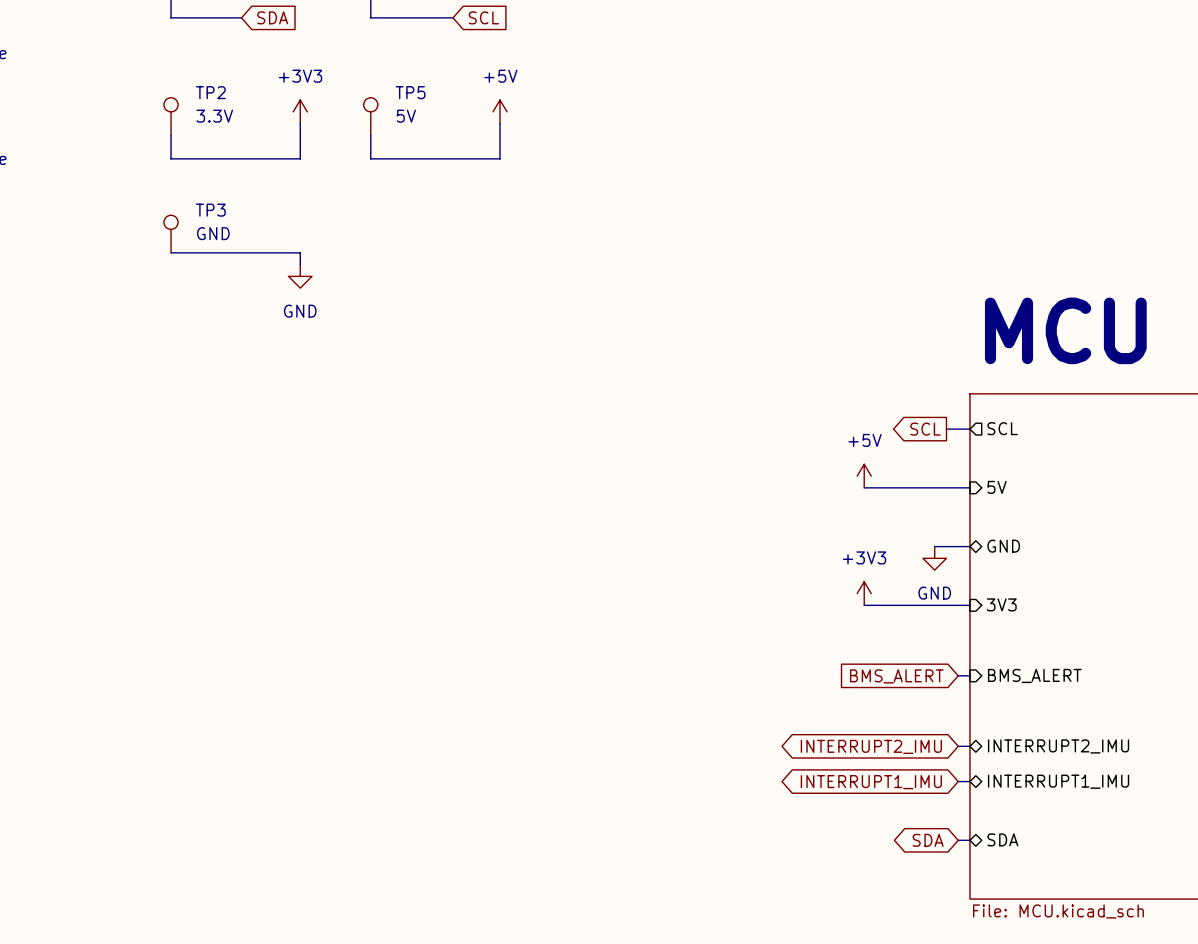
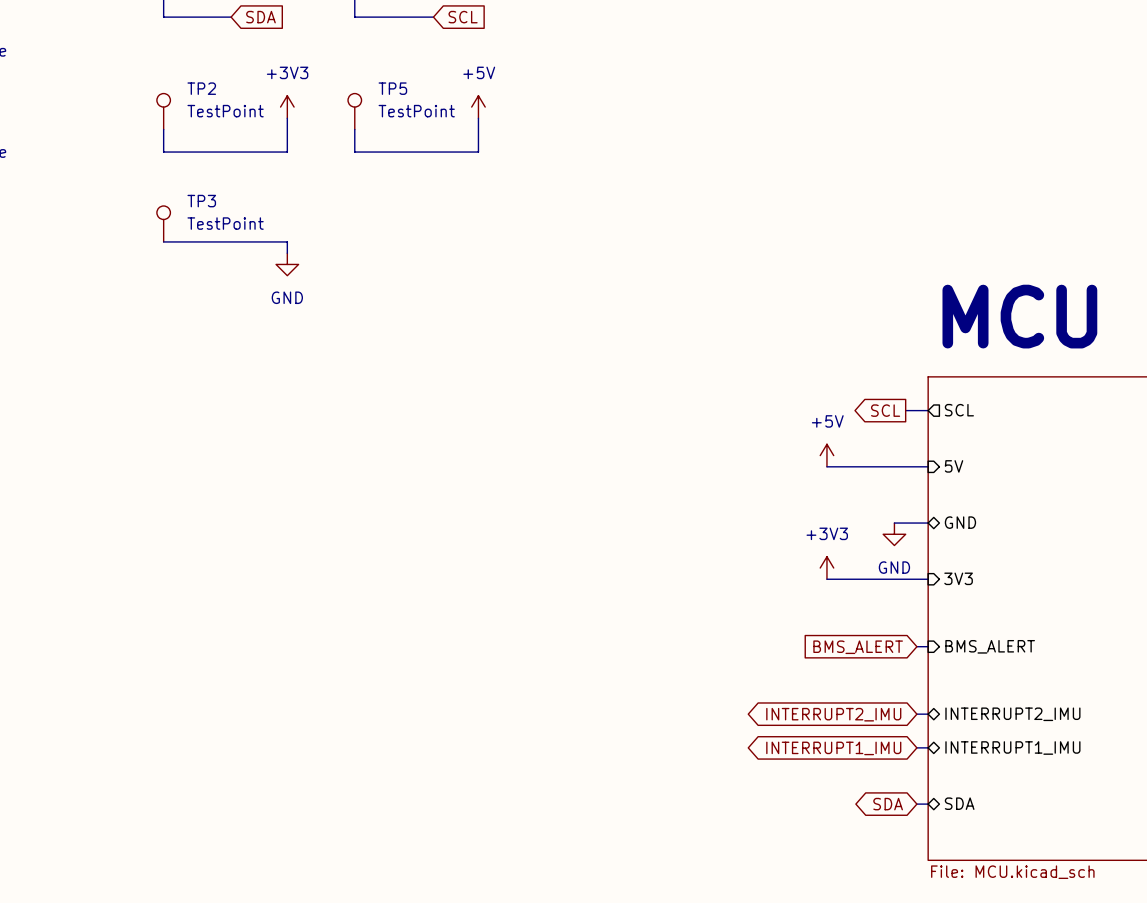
TP2 value: 3.3V (214, 116) -> TestPoint (225, 111)
TP5 value: 5V (406, 116) -> TestPoint (416, 111)
TP3 value: GND (213, 233) -> TestPoint (225, 223)

